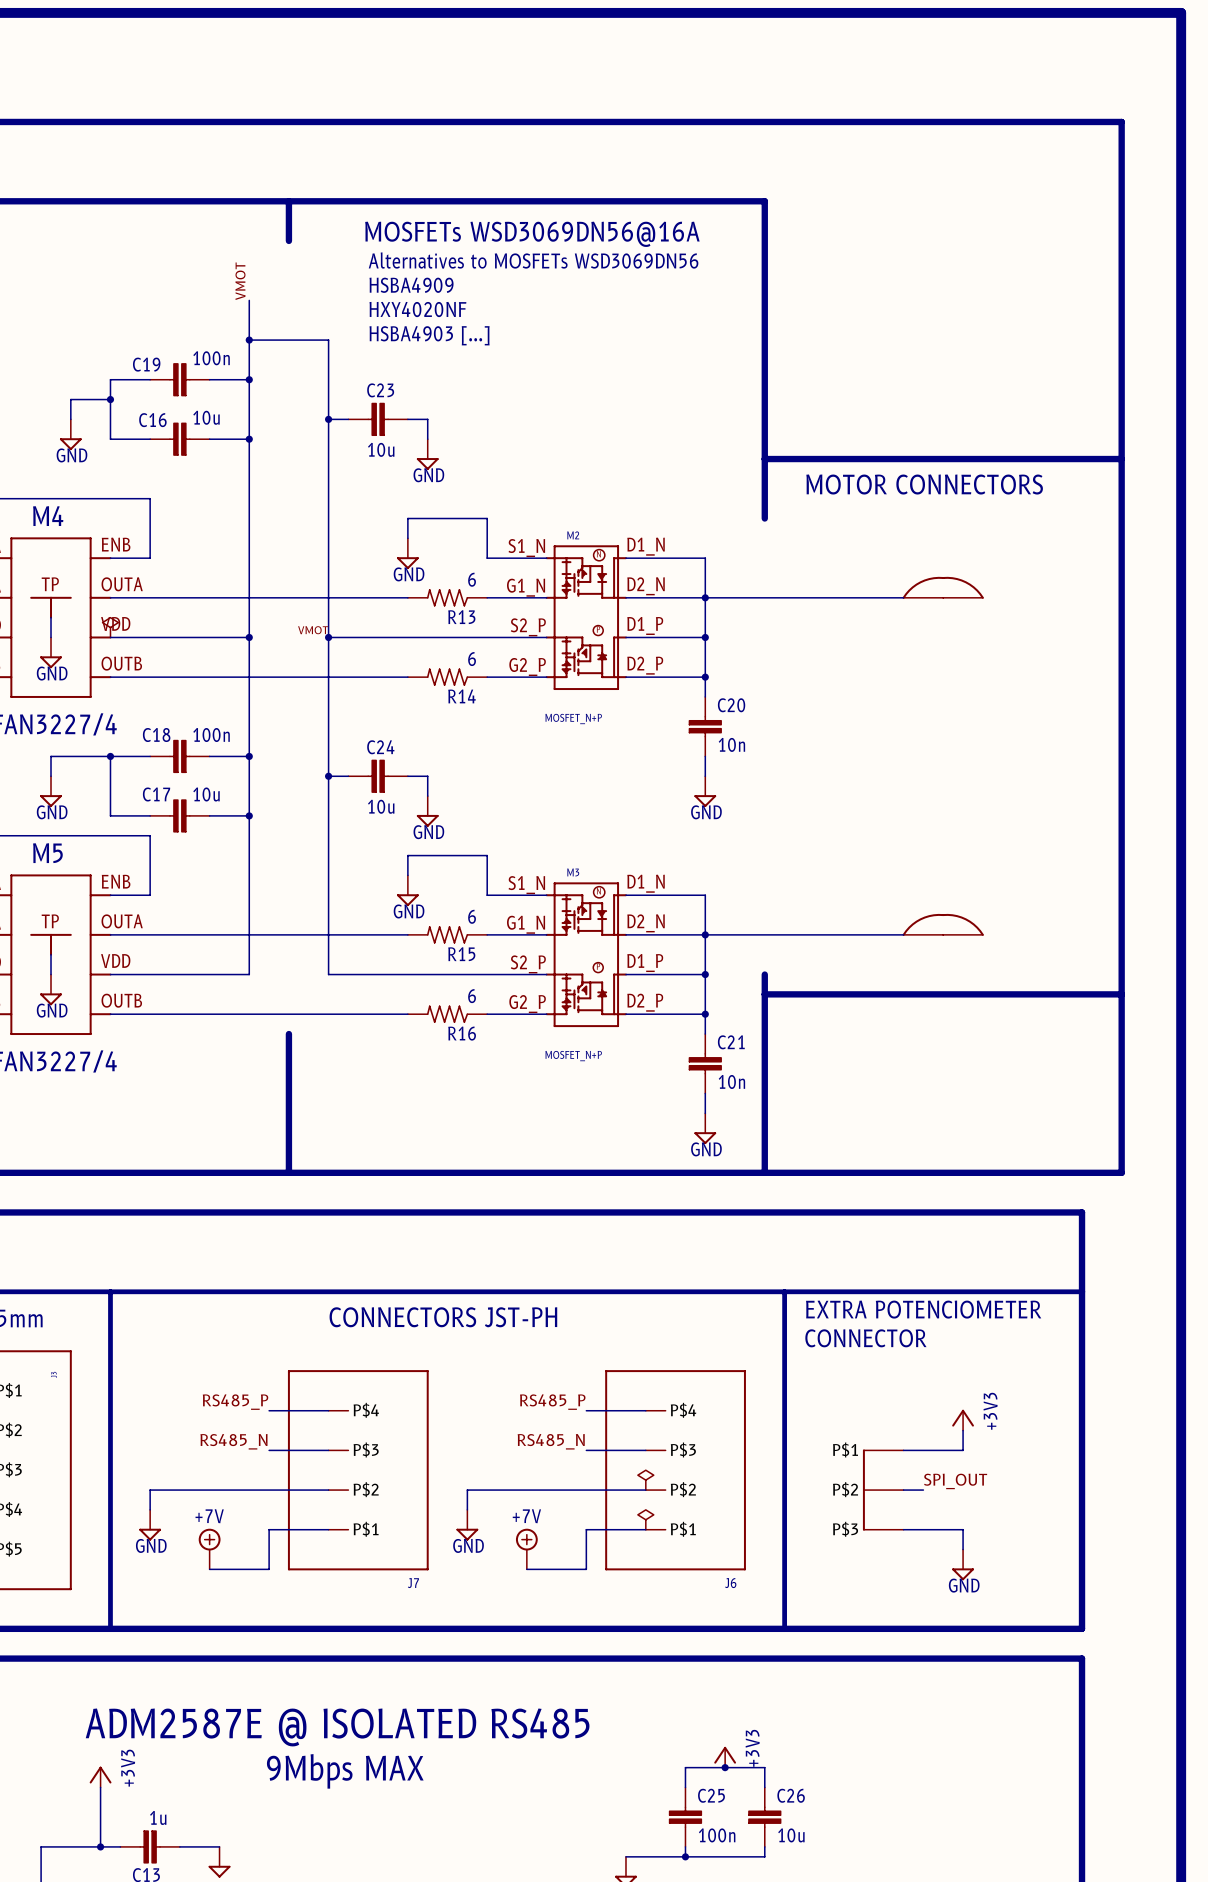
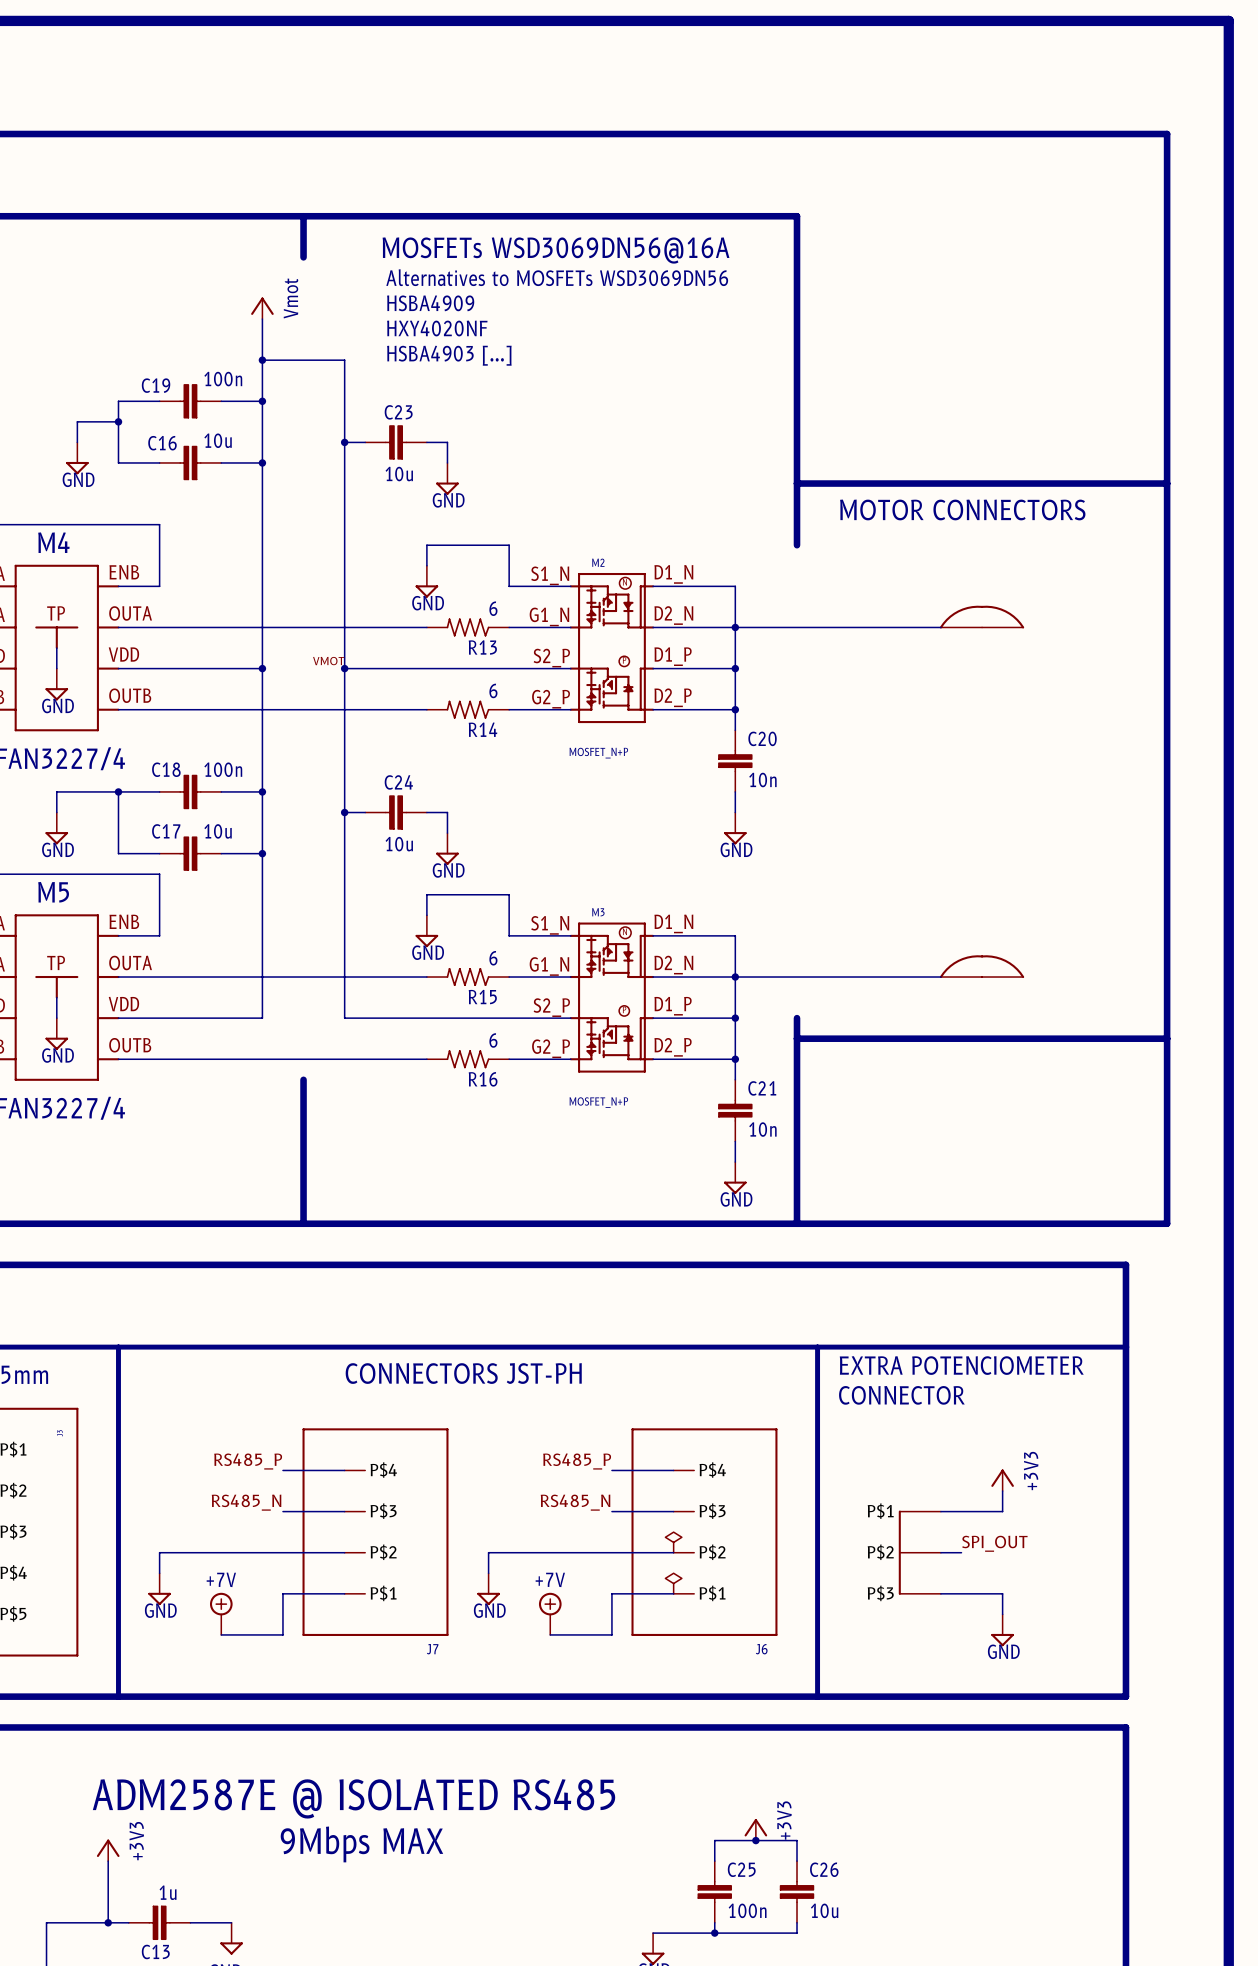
label: VMOT (240, 281) -> none
power symbol: none -> Vmot (262, 308)
power symbol: (110, 627) -> none

